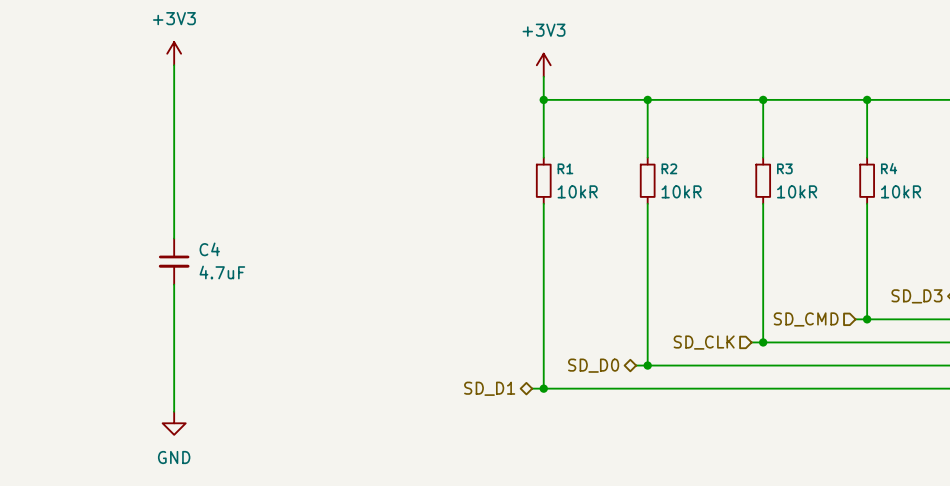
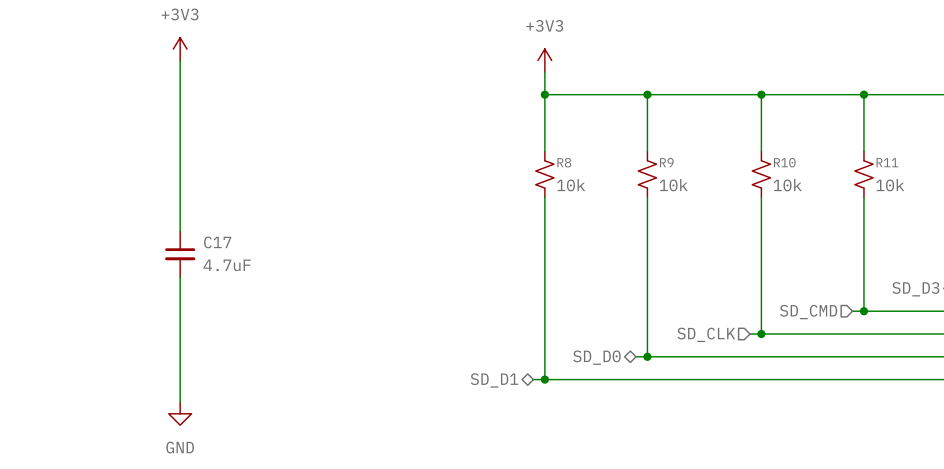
R1: 10kR (543, 180) -> none
R8: none -> 10k (544, 174)
R2: 10kR (647, 180) -> none
R9: none -> 10k (647, 174)
R3: 10kR (763, 180) -> none
R10: none -> 10k (761, 174)
R4: 10kR (867, 180) -> none
R11: none -> 10k (863, 174)
C4 name: C4 (209, 249) -> C17 (217, 242)

